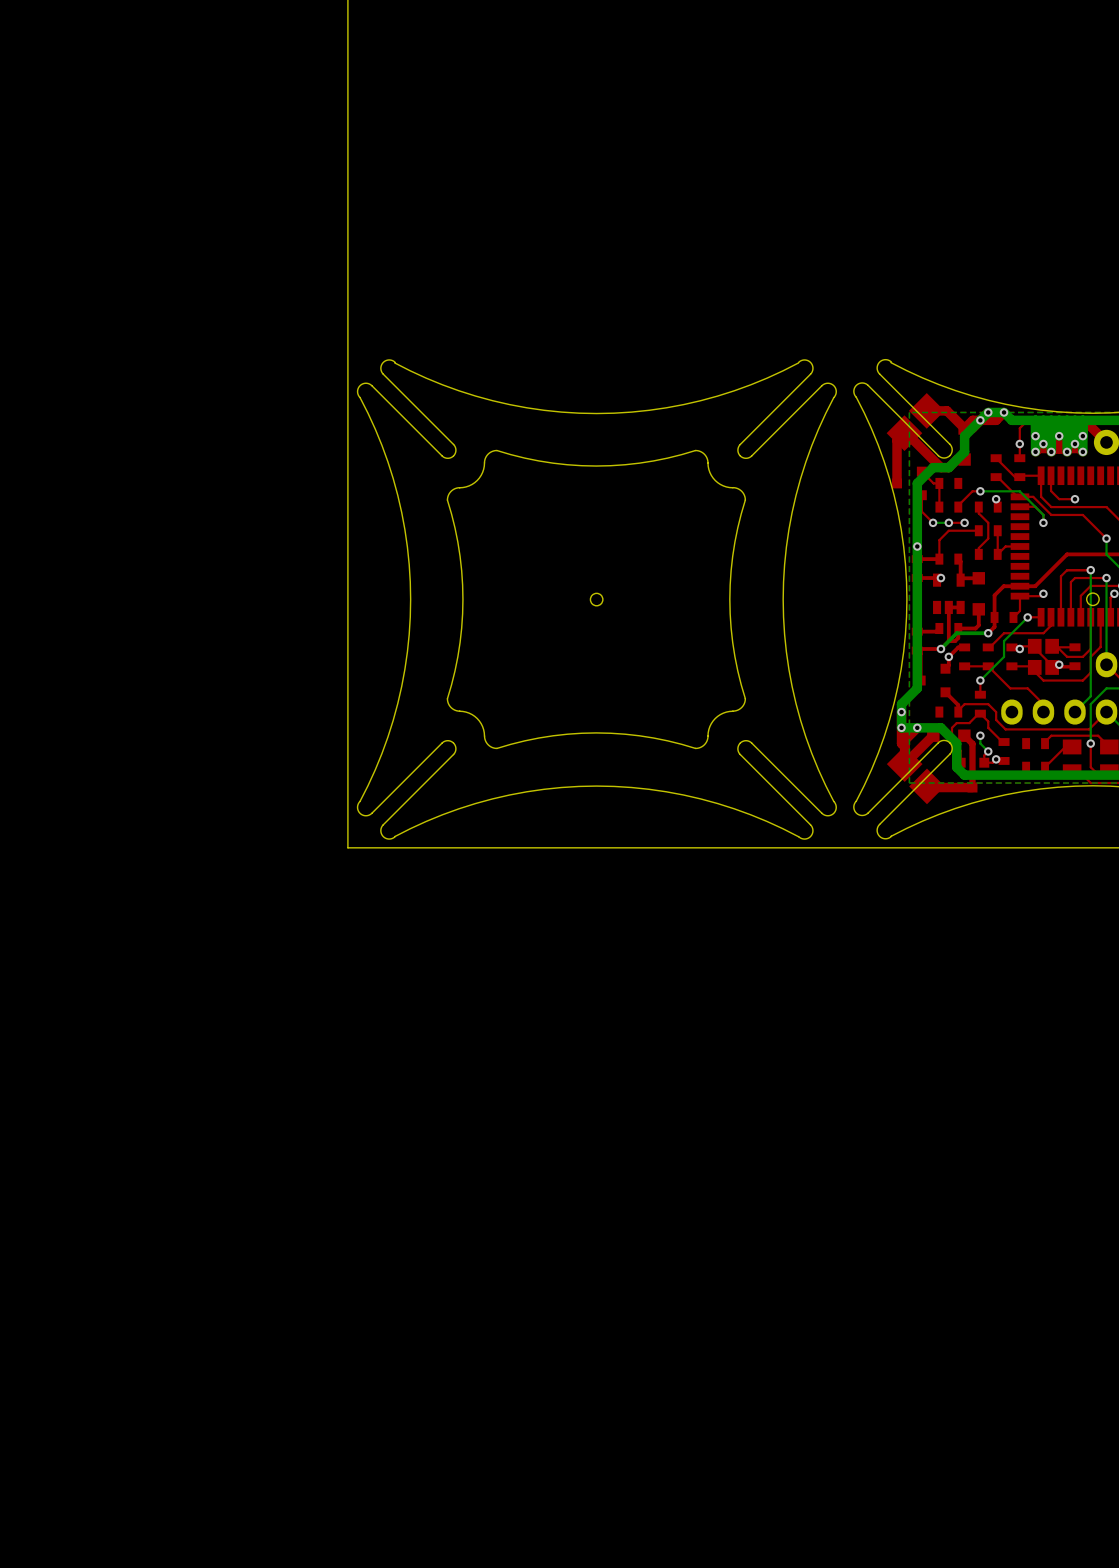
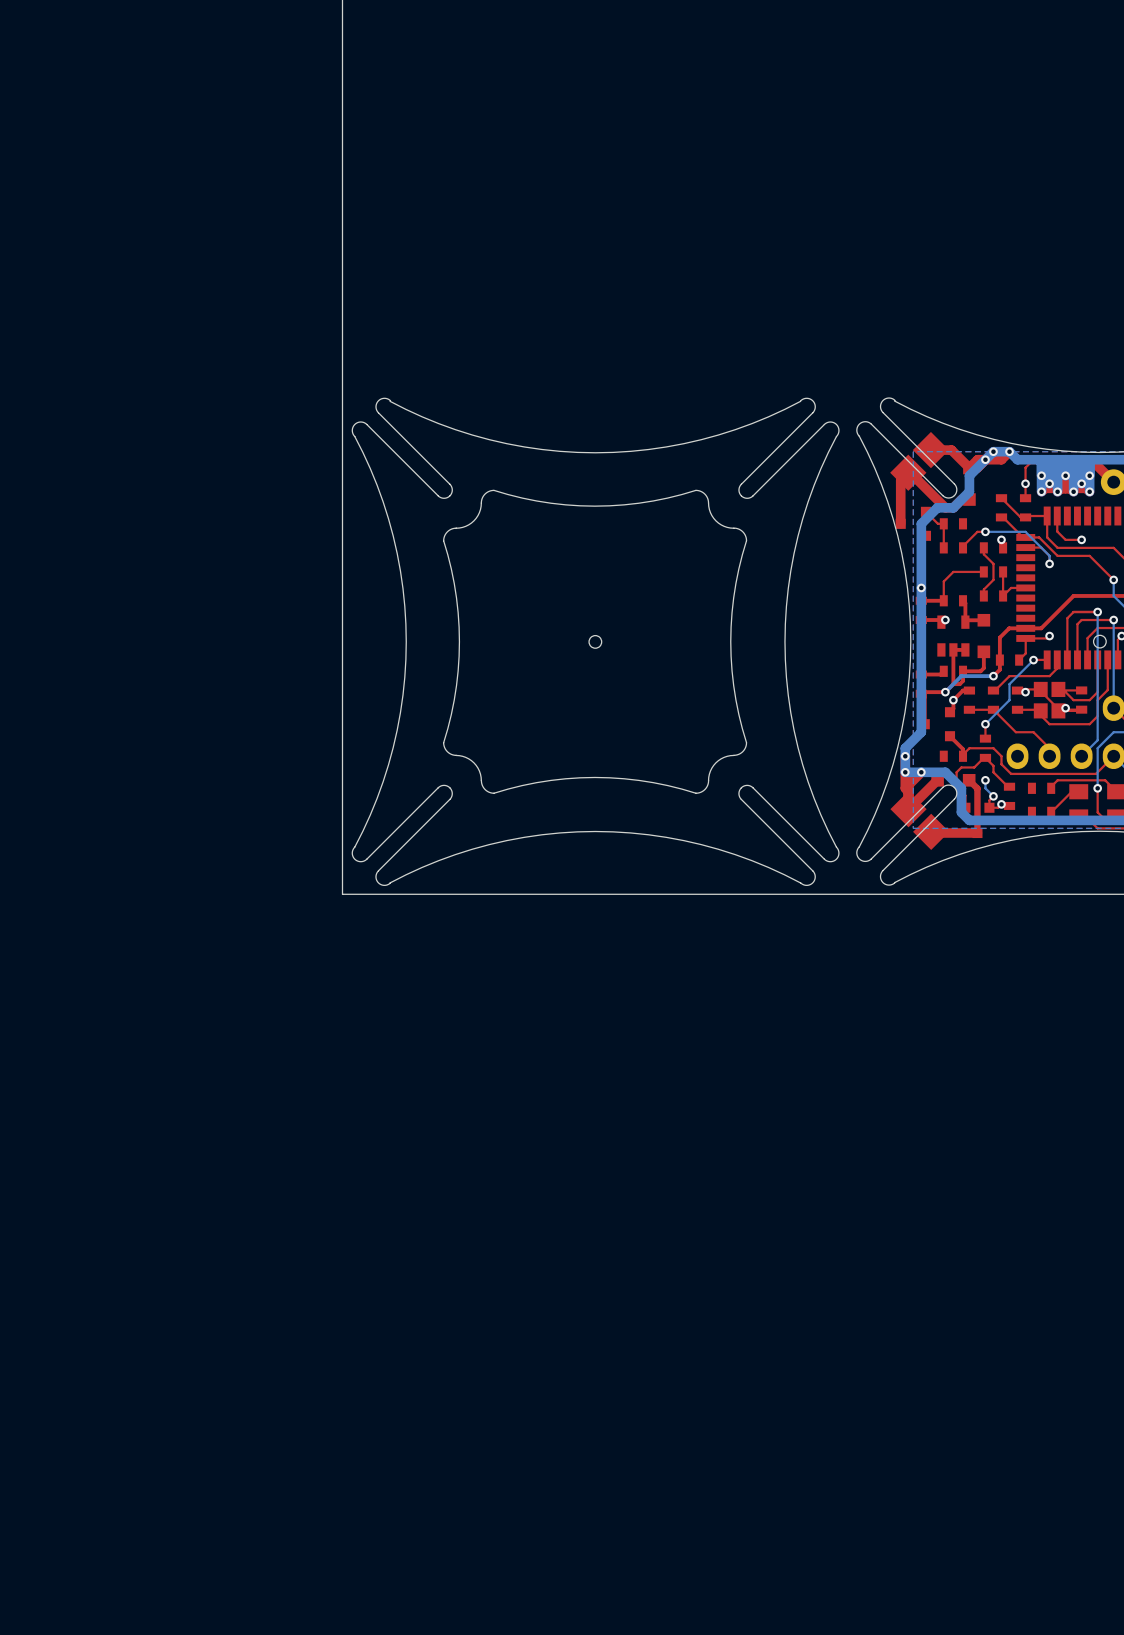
top track: (921, 495) (921, 511) (933, 522) -> none
via: (933, 522) -> none
bottom track: (948, 522) (933, 522) -> none
via: (948, 522) -> none
top track: (964, 522) (948, 522) -> none
via: (964, 522) -> none

